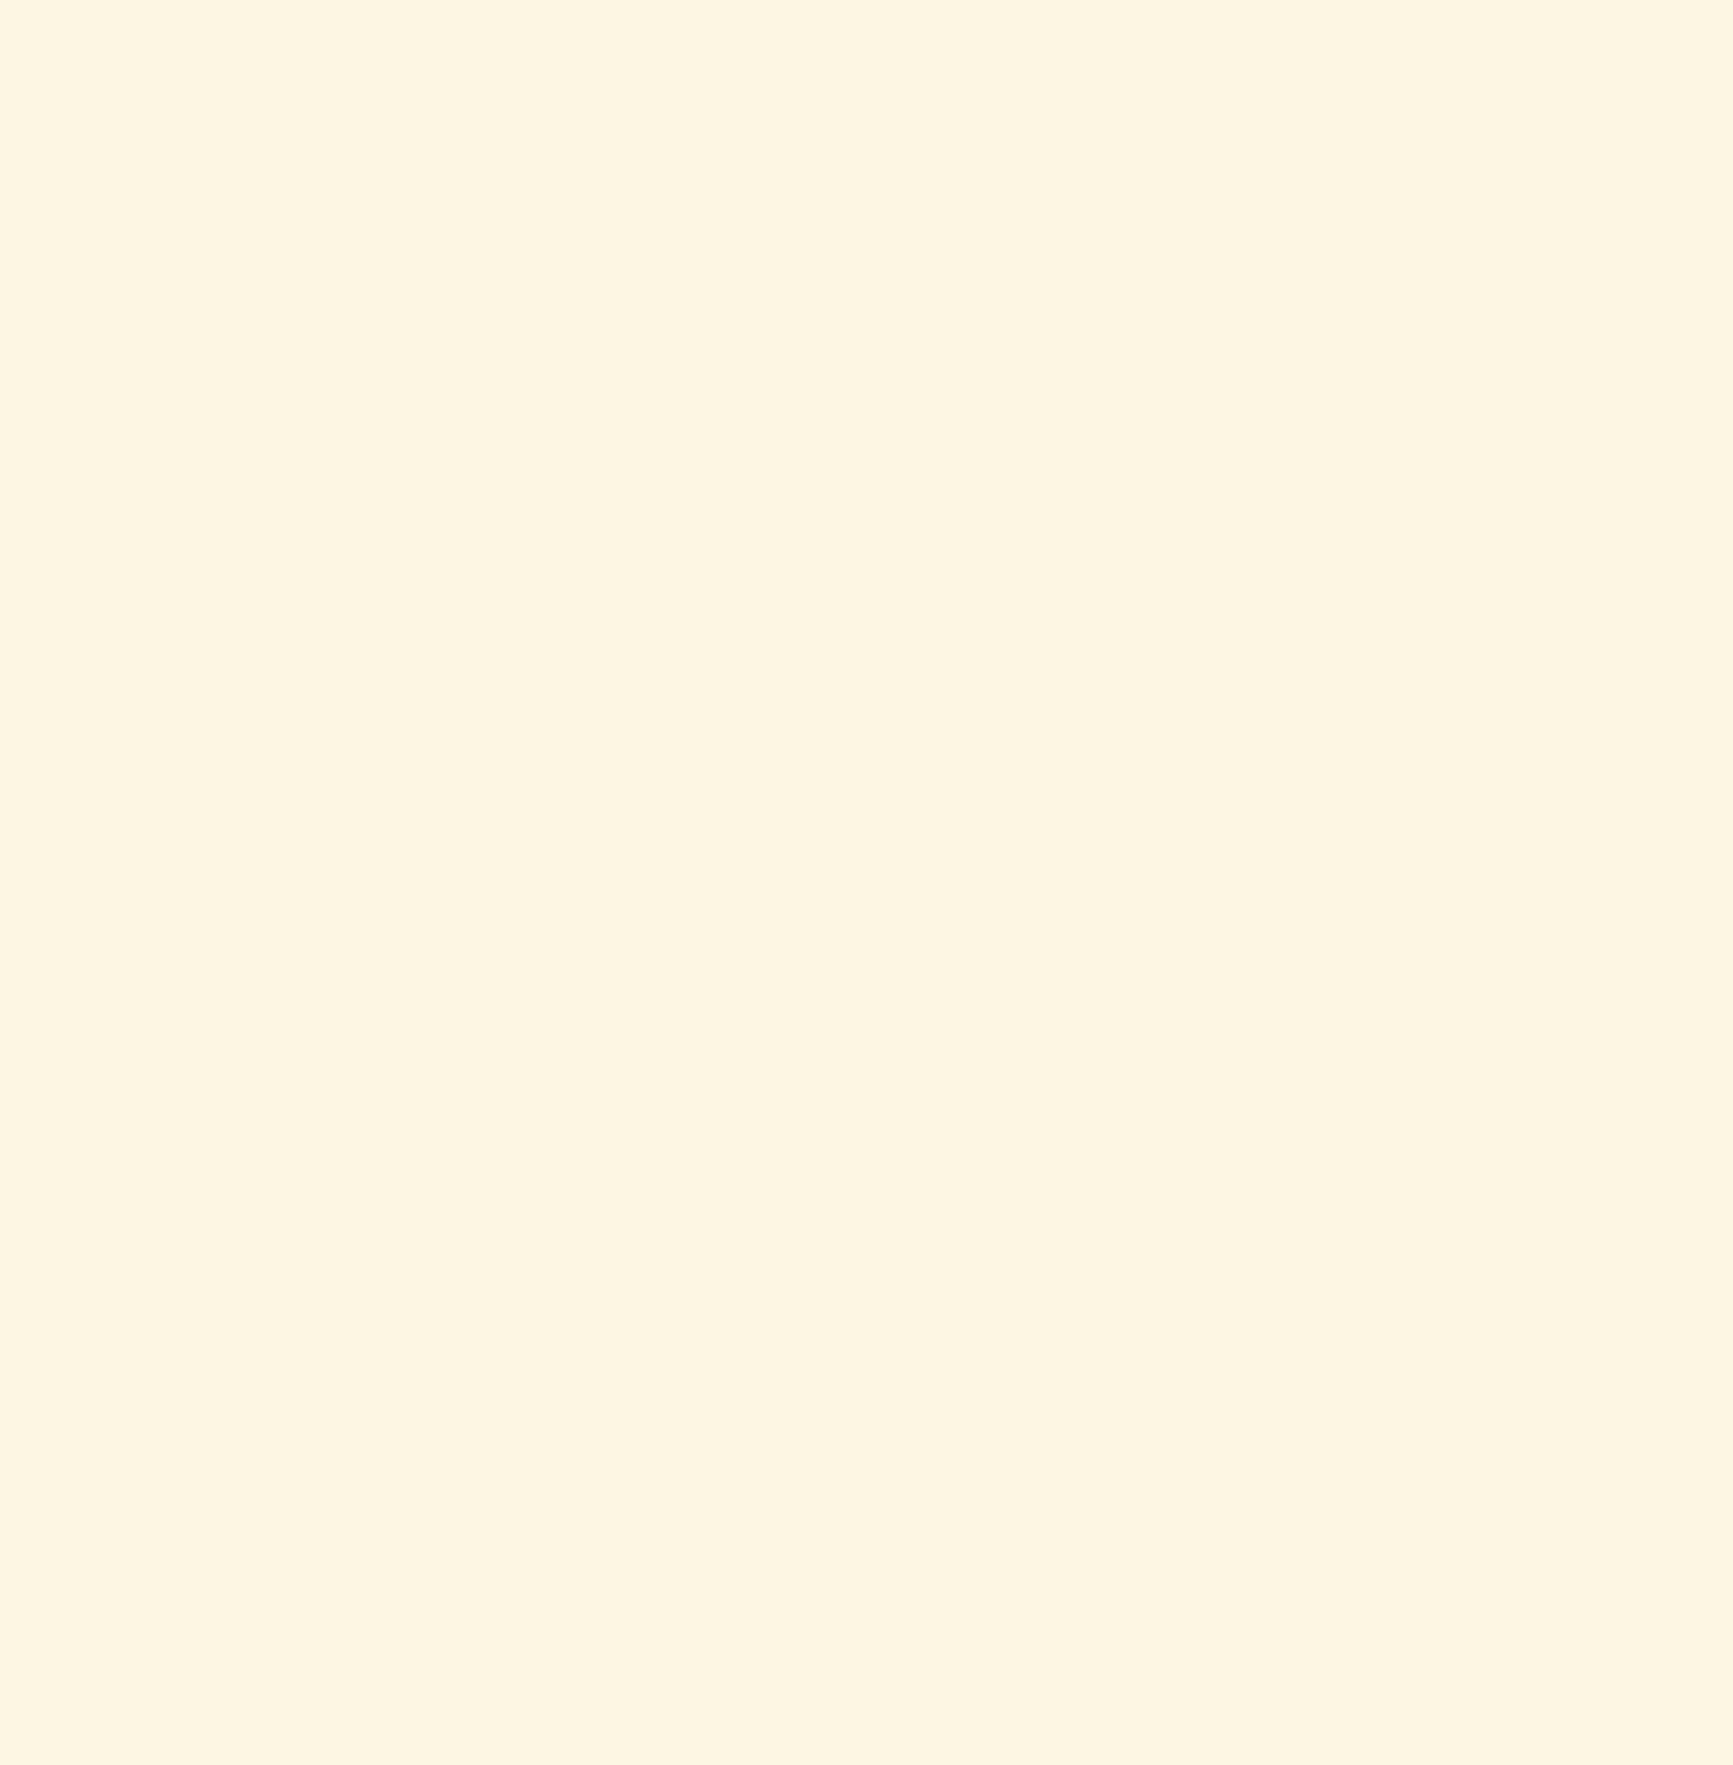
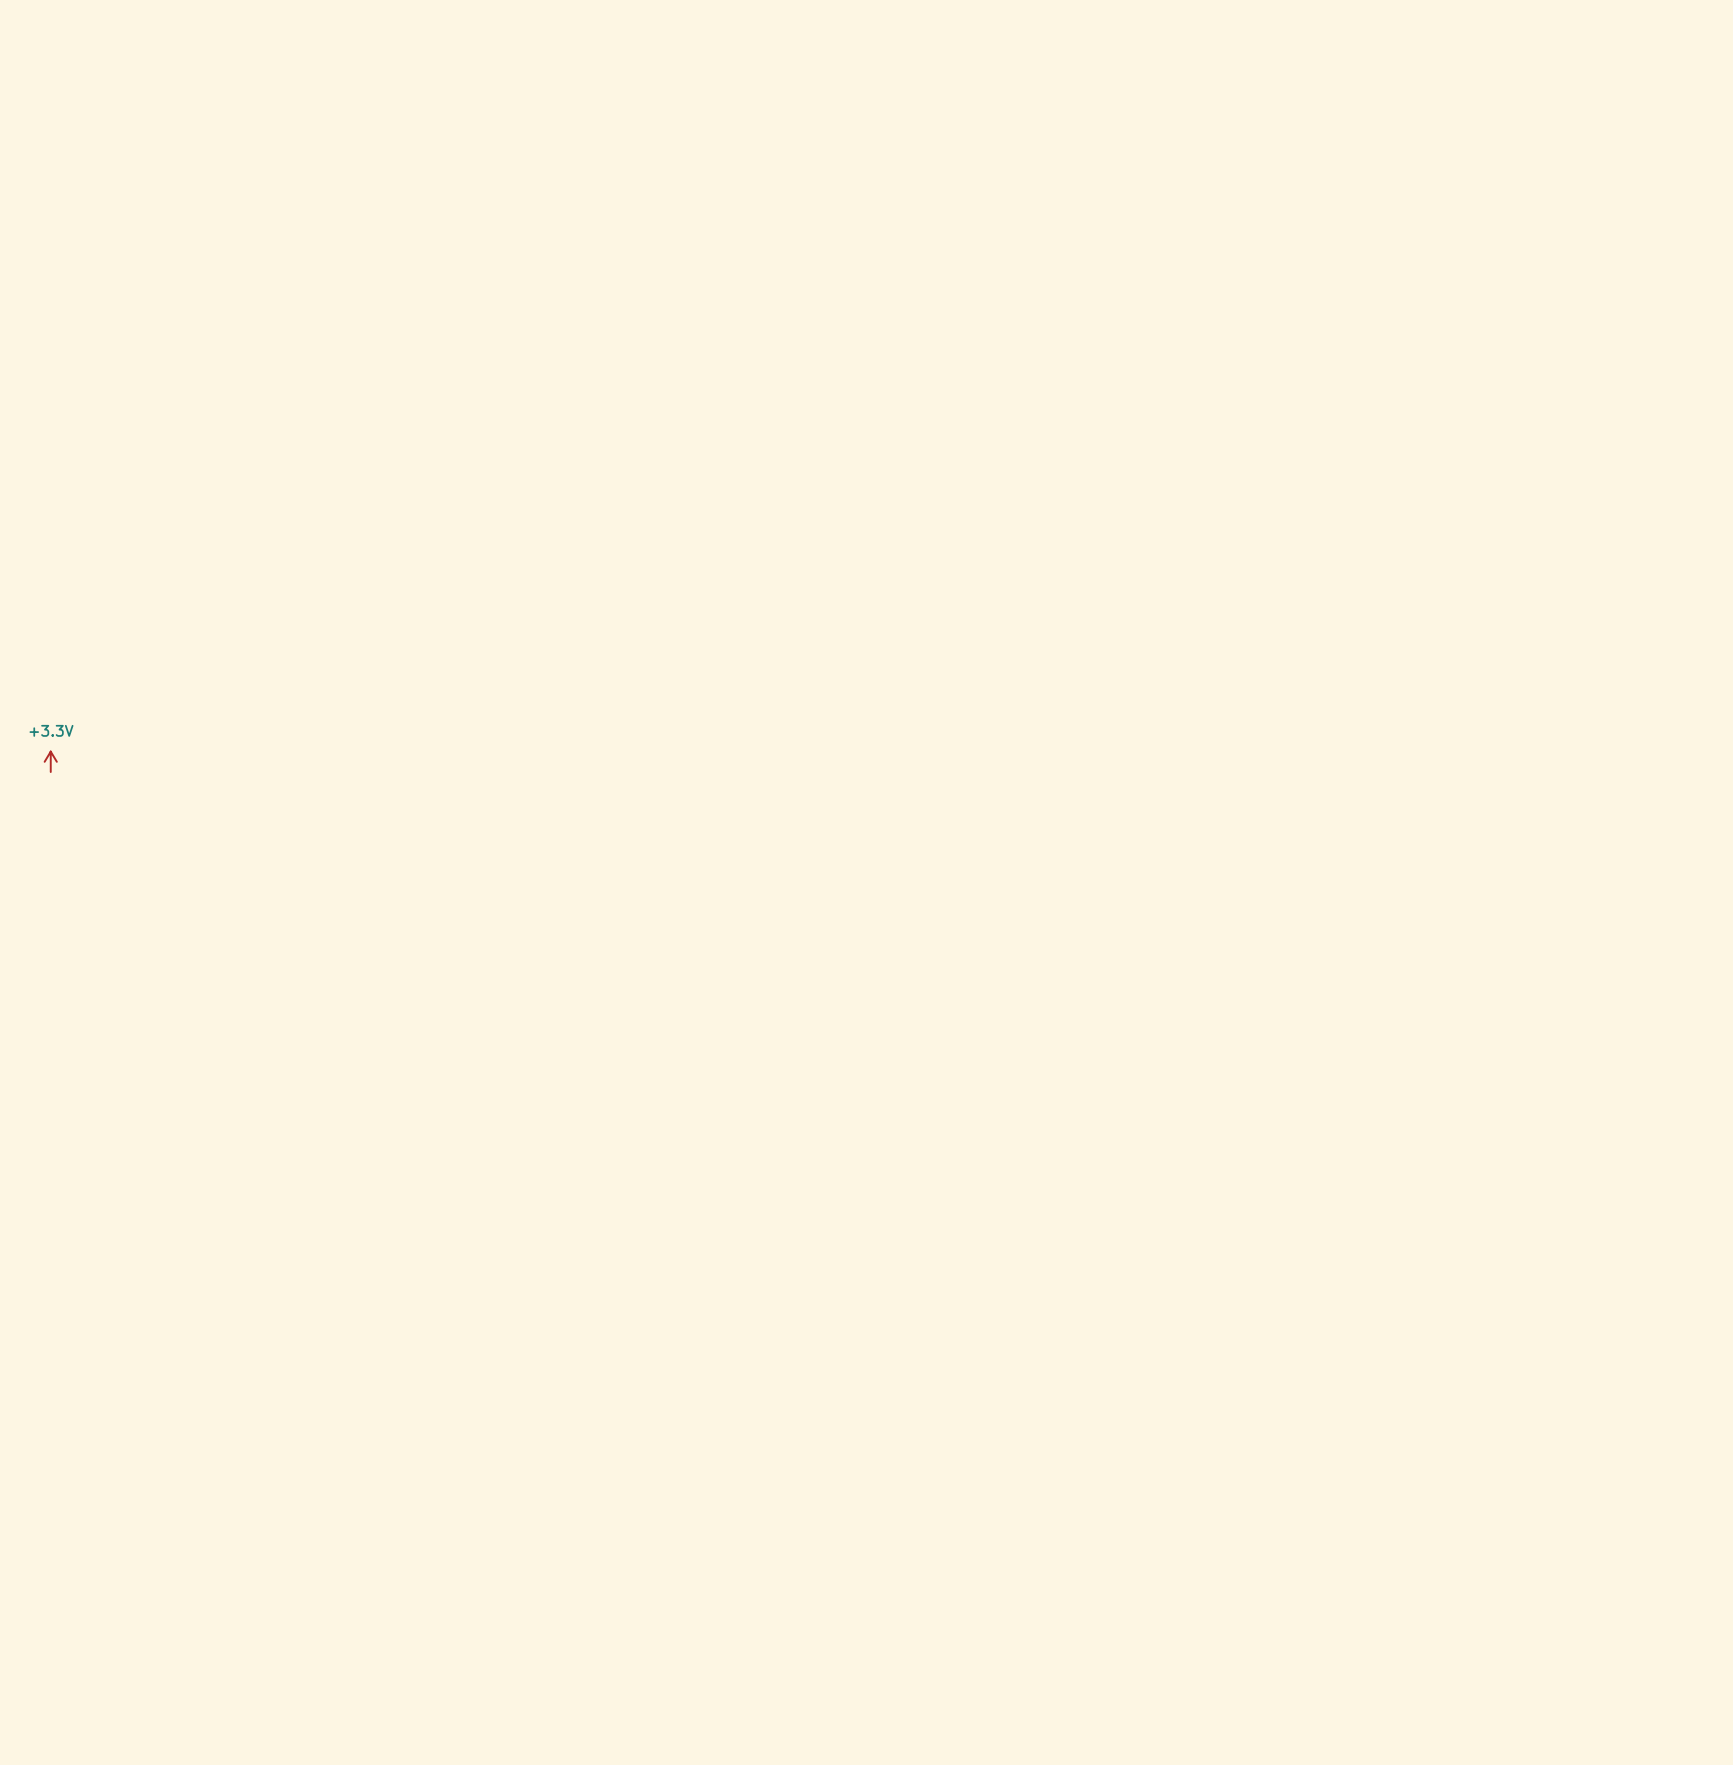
power symbol: none -> +3.3V (50, 761)

